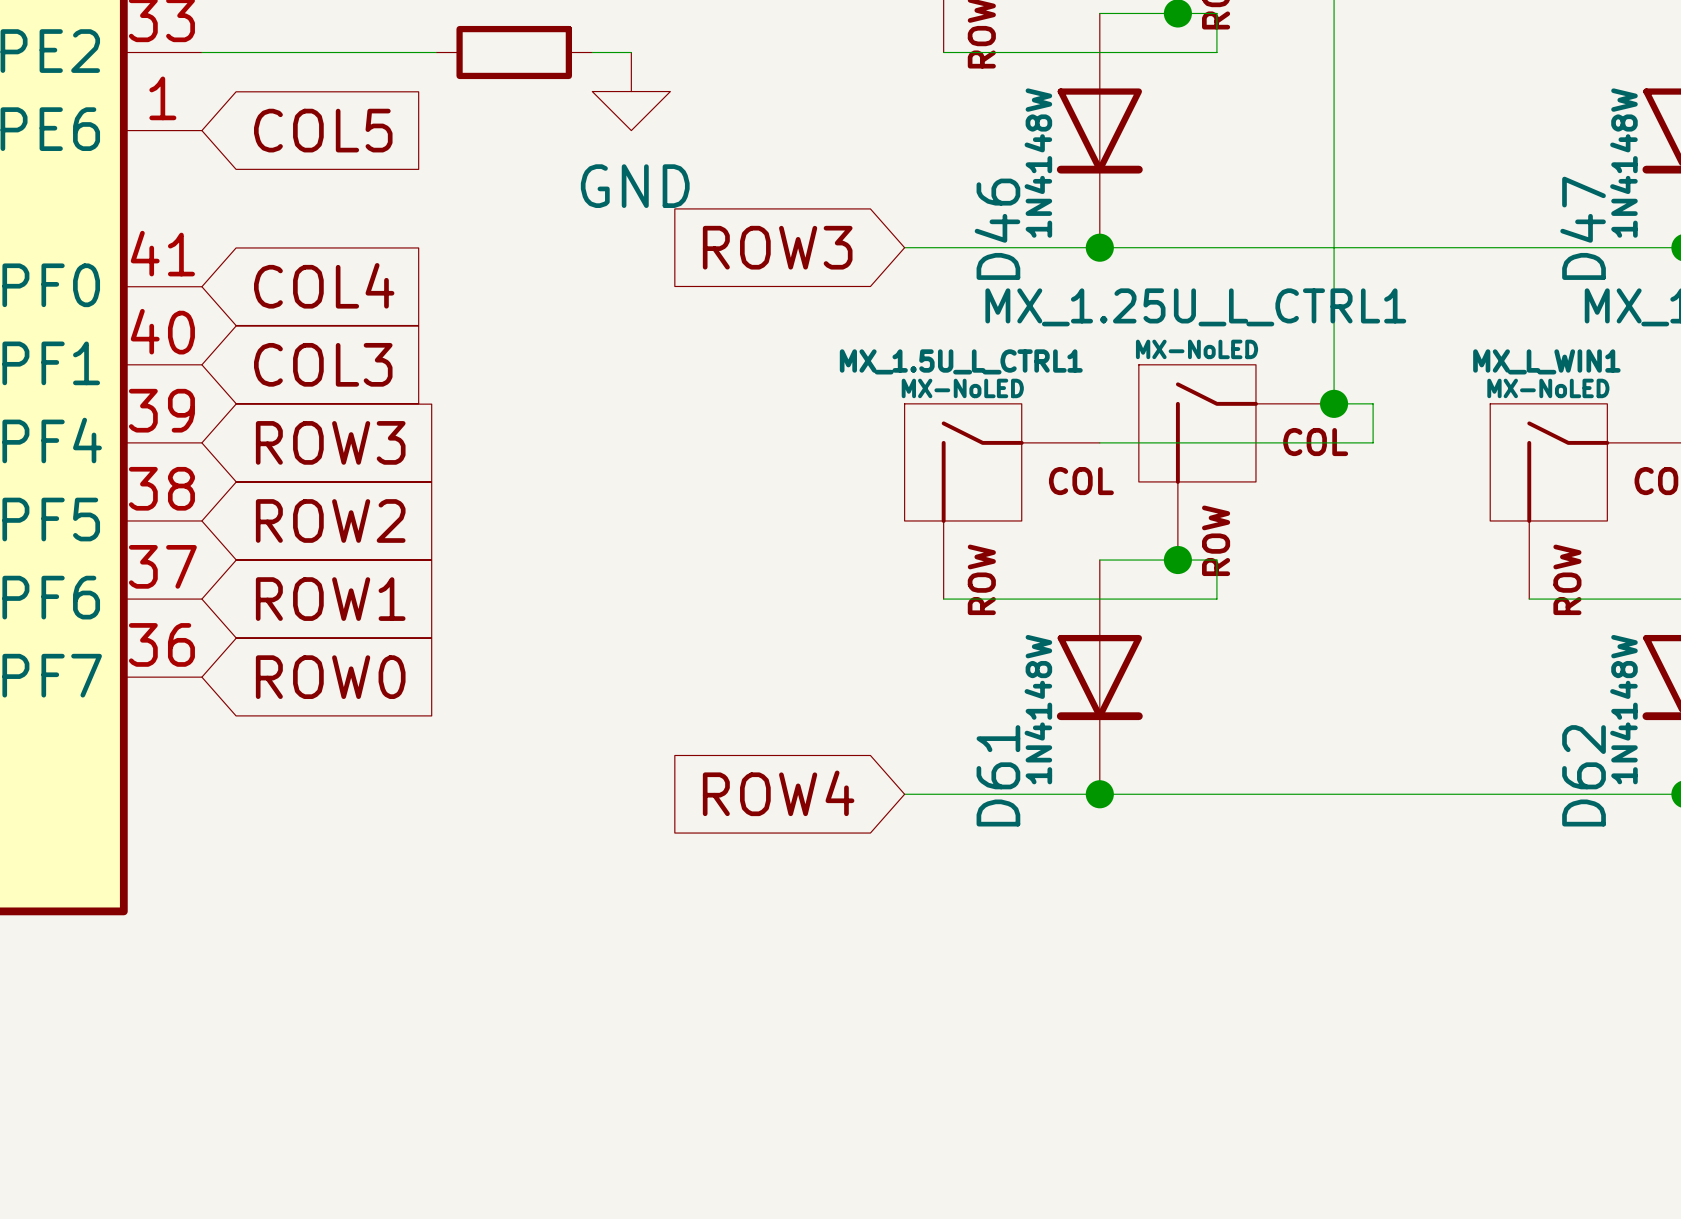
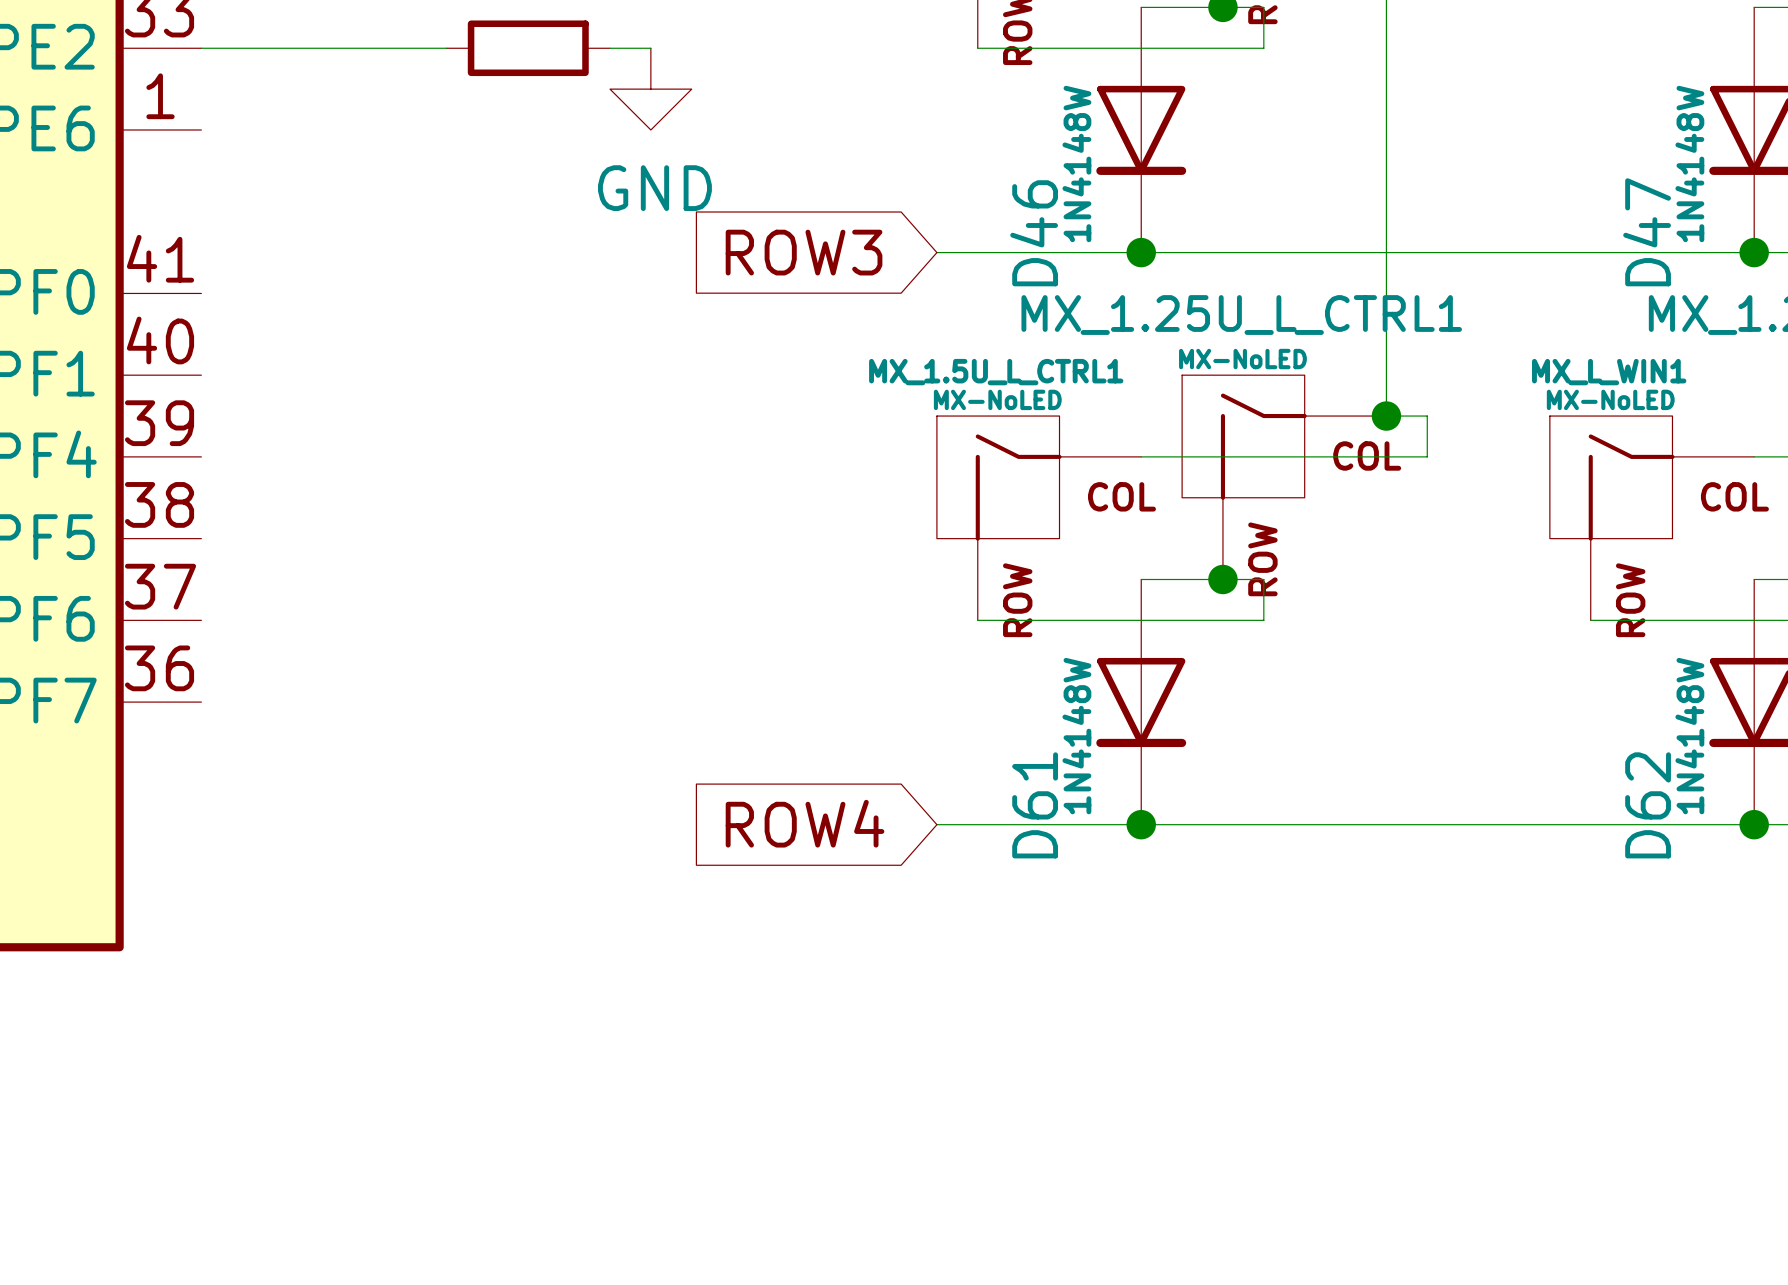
global label: COL5 (323, 130) -> none
global label: COL4 (324, 285) -> none
global label: COL3 (323, 364) -> none
global label: ROW3 (330, 442) -> none
global label: ROW2 (330, 520) -> none
global label: ROW1 (330, 599) -> none
global label: ROW0 (330, 677) -> none

